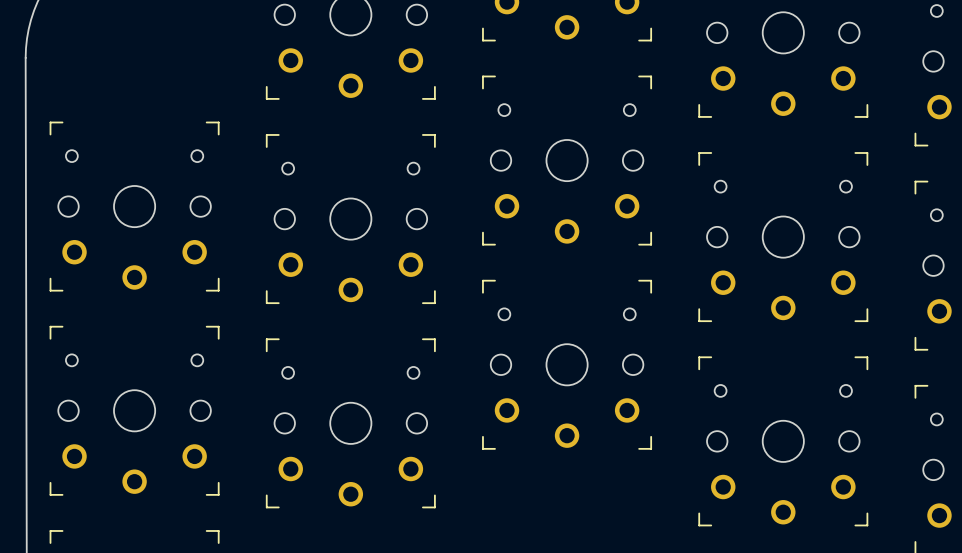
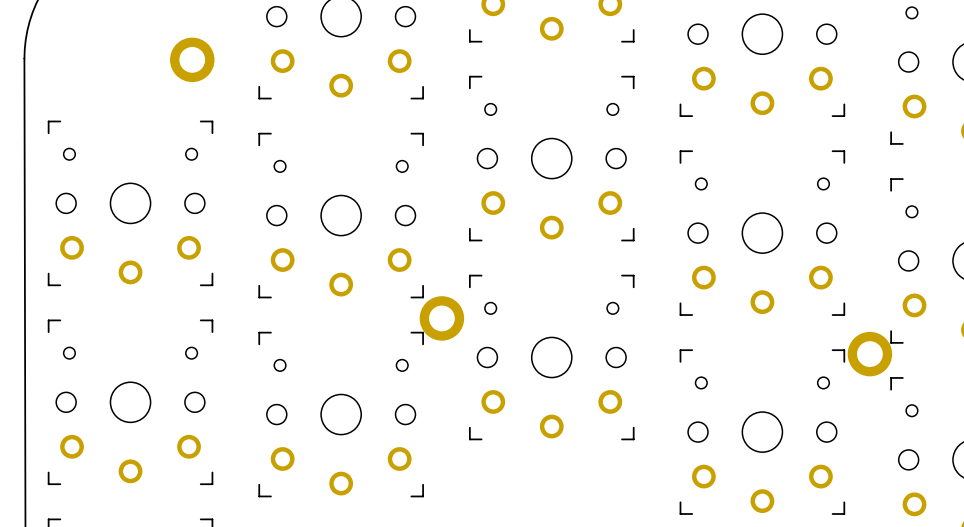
part: none -> (192, 59)
part: none -> (441, 318)
part: none -> (869, 354)

